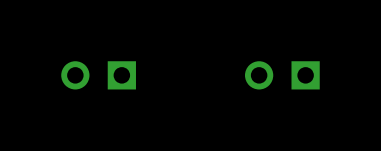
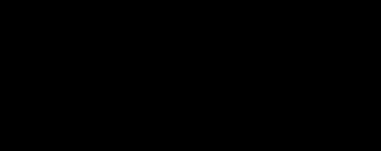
part: (98, 75) -> none
part: (282, 75) -> none

